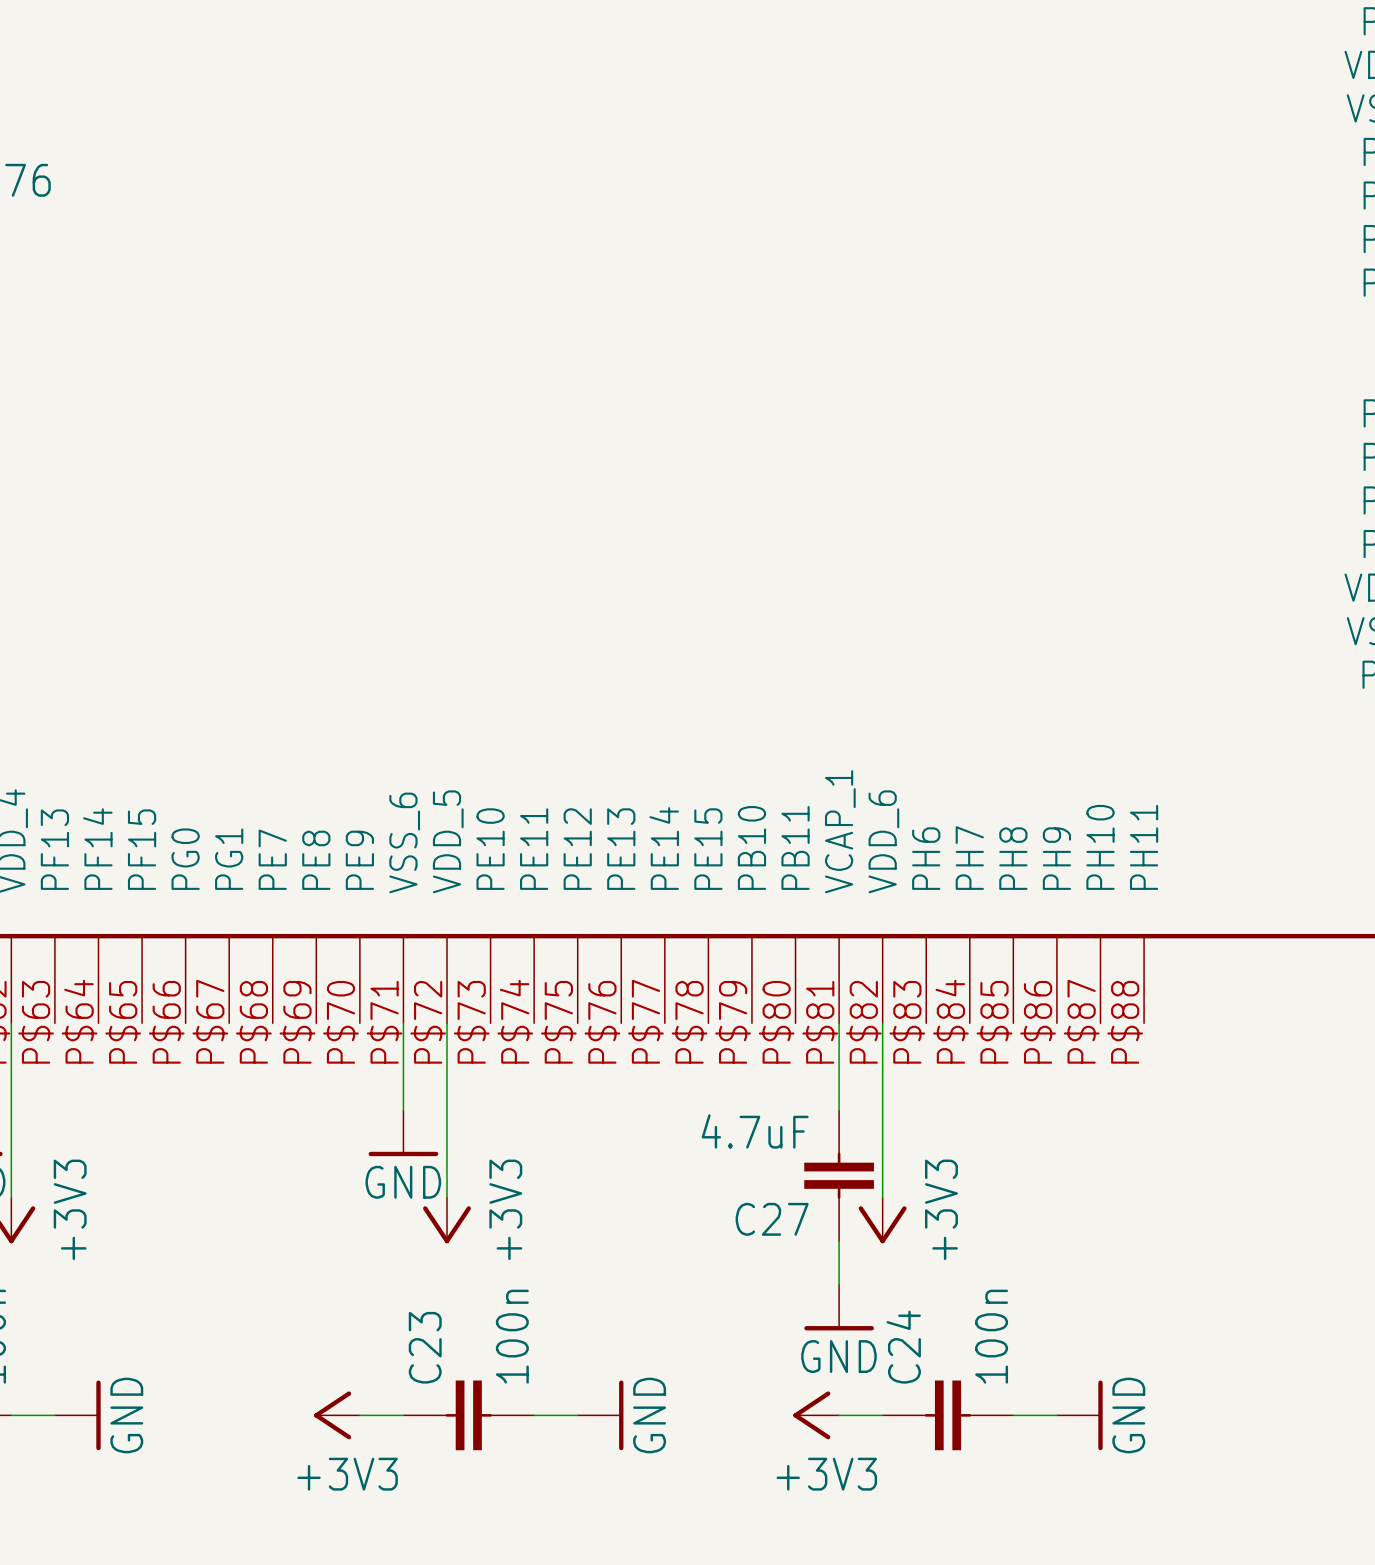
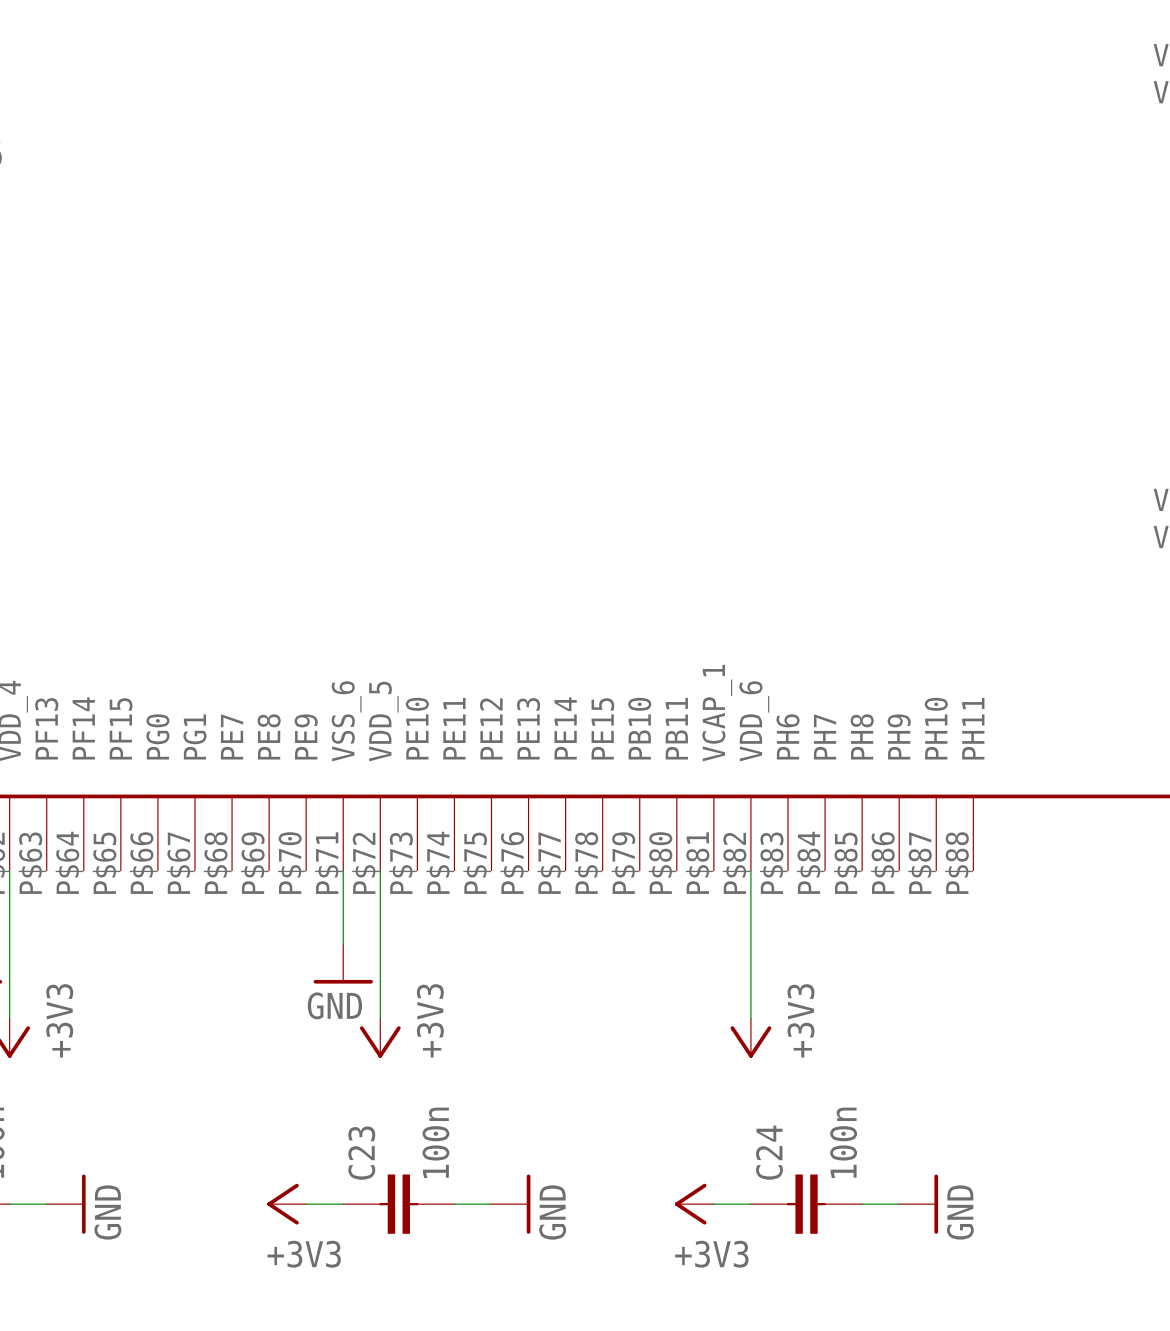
wire: (839, 1023) (839, 1110) -> none
C27: 4.7uF (839, 1175) -> none
wire: (839, 1241) (839, 1284) -> none
power symbol: GND (839, 1307) -> none

